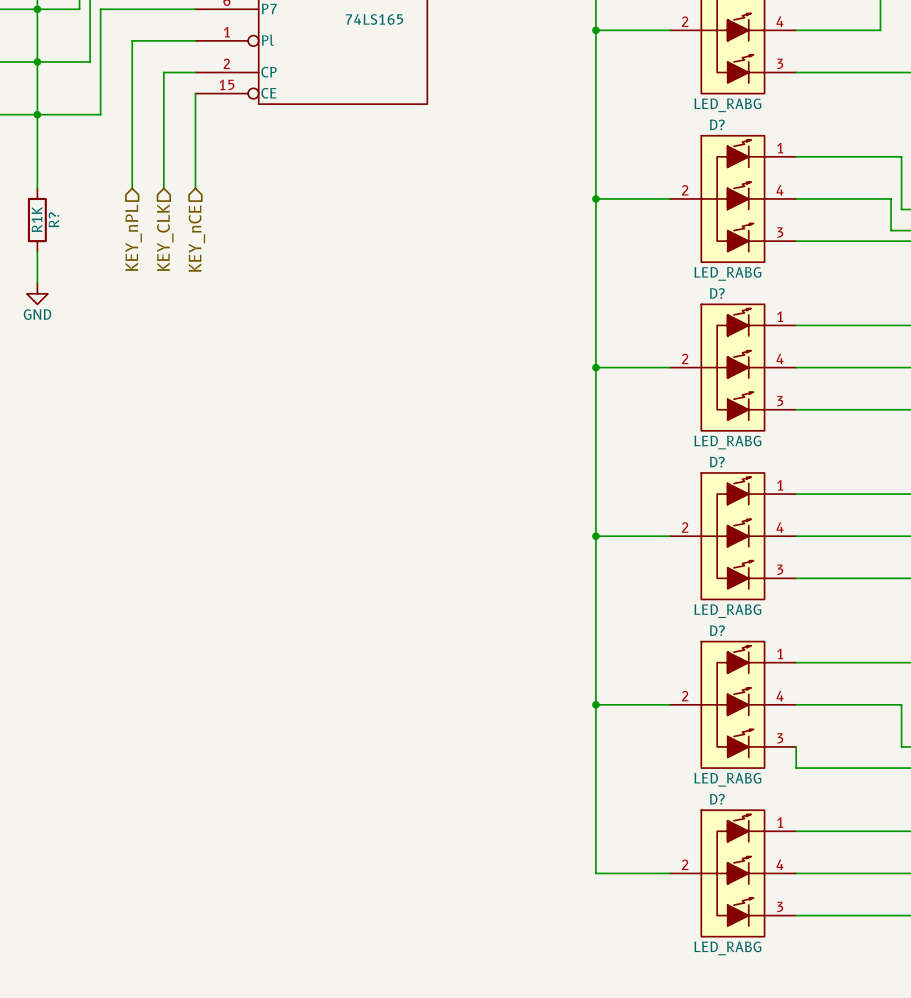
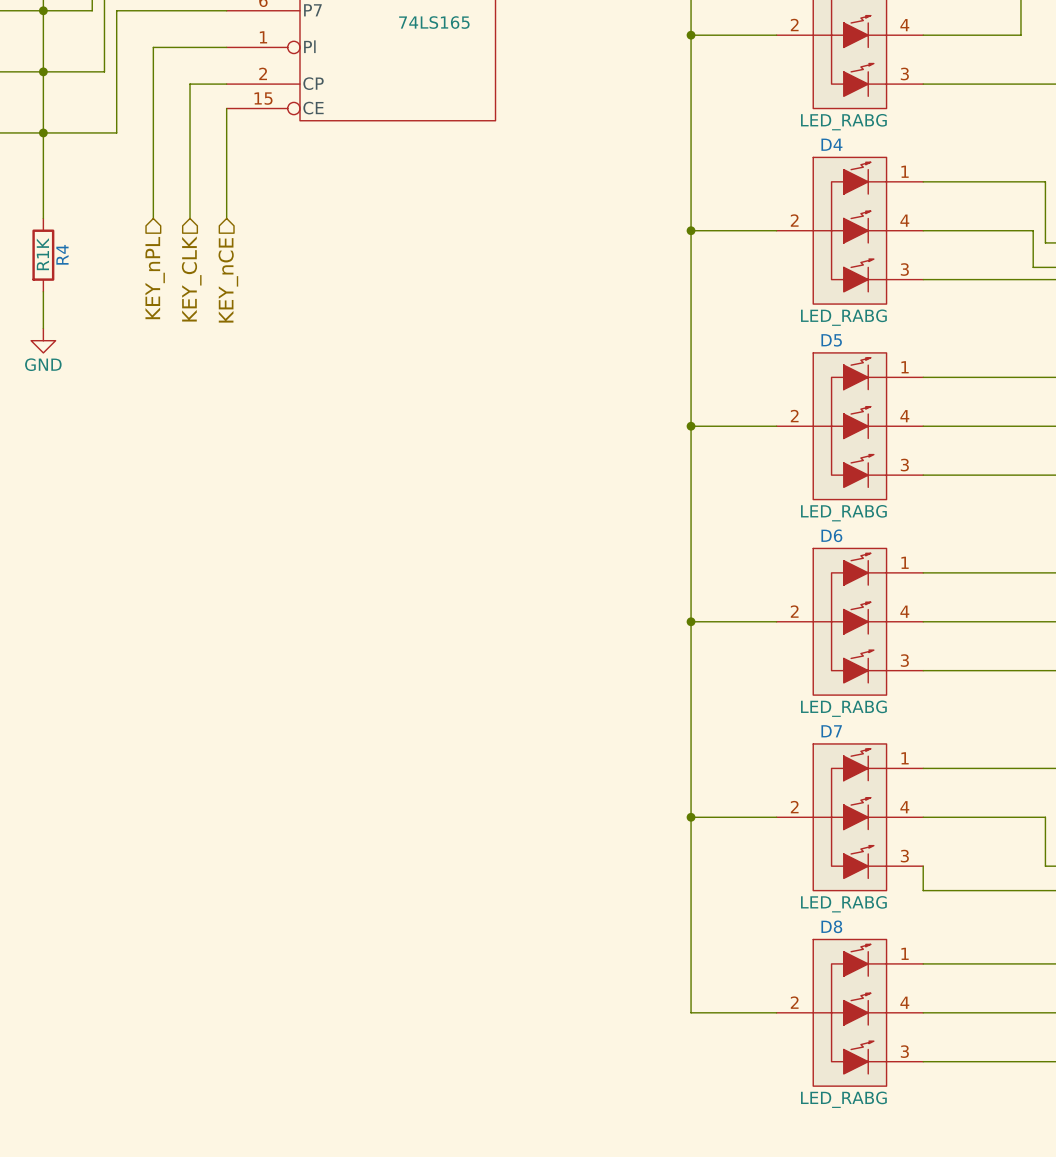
D? name: D? (717, 124) -> D4 (831, 144)
R? name: R? (53, 219) -> R4 (62, 254)
D? name: D? (717, 293) -> D5 (831, 340)
D? name: D? (717, 462) -> D6 (831, 535)
D? name: D? (717, 630) -> D7 (831, 731)
D? name: D? (717, 799) -> D8 (831, 926)

